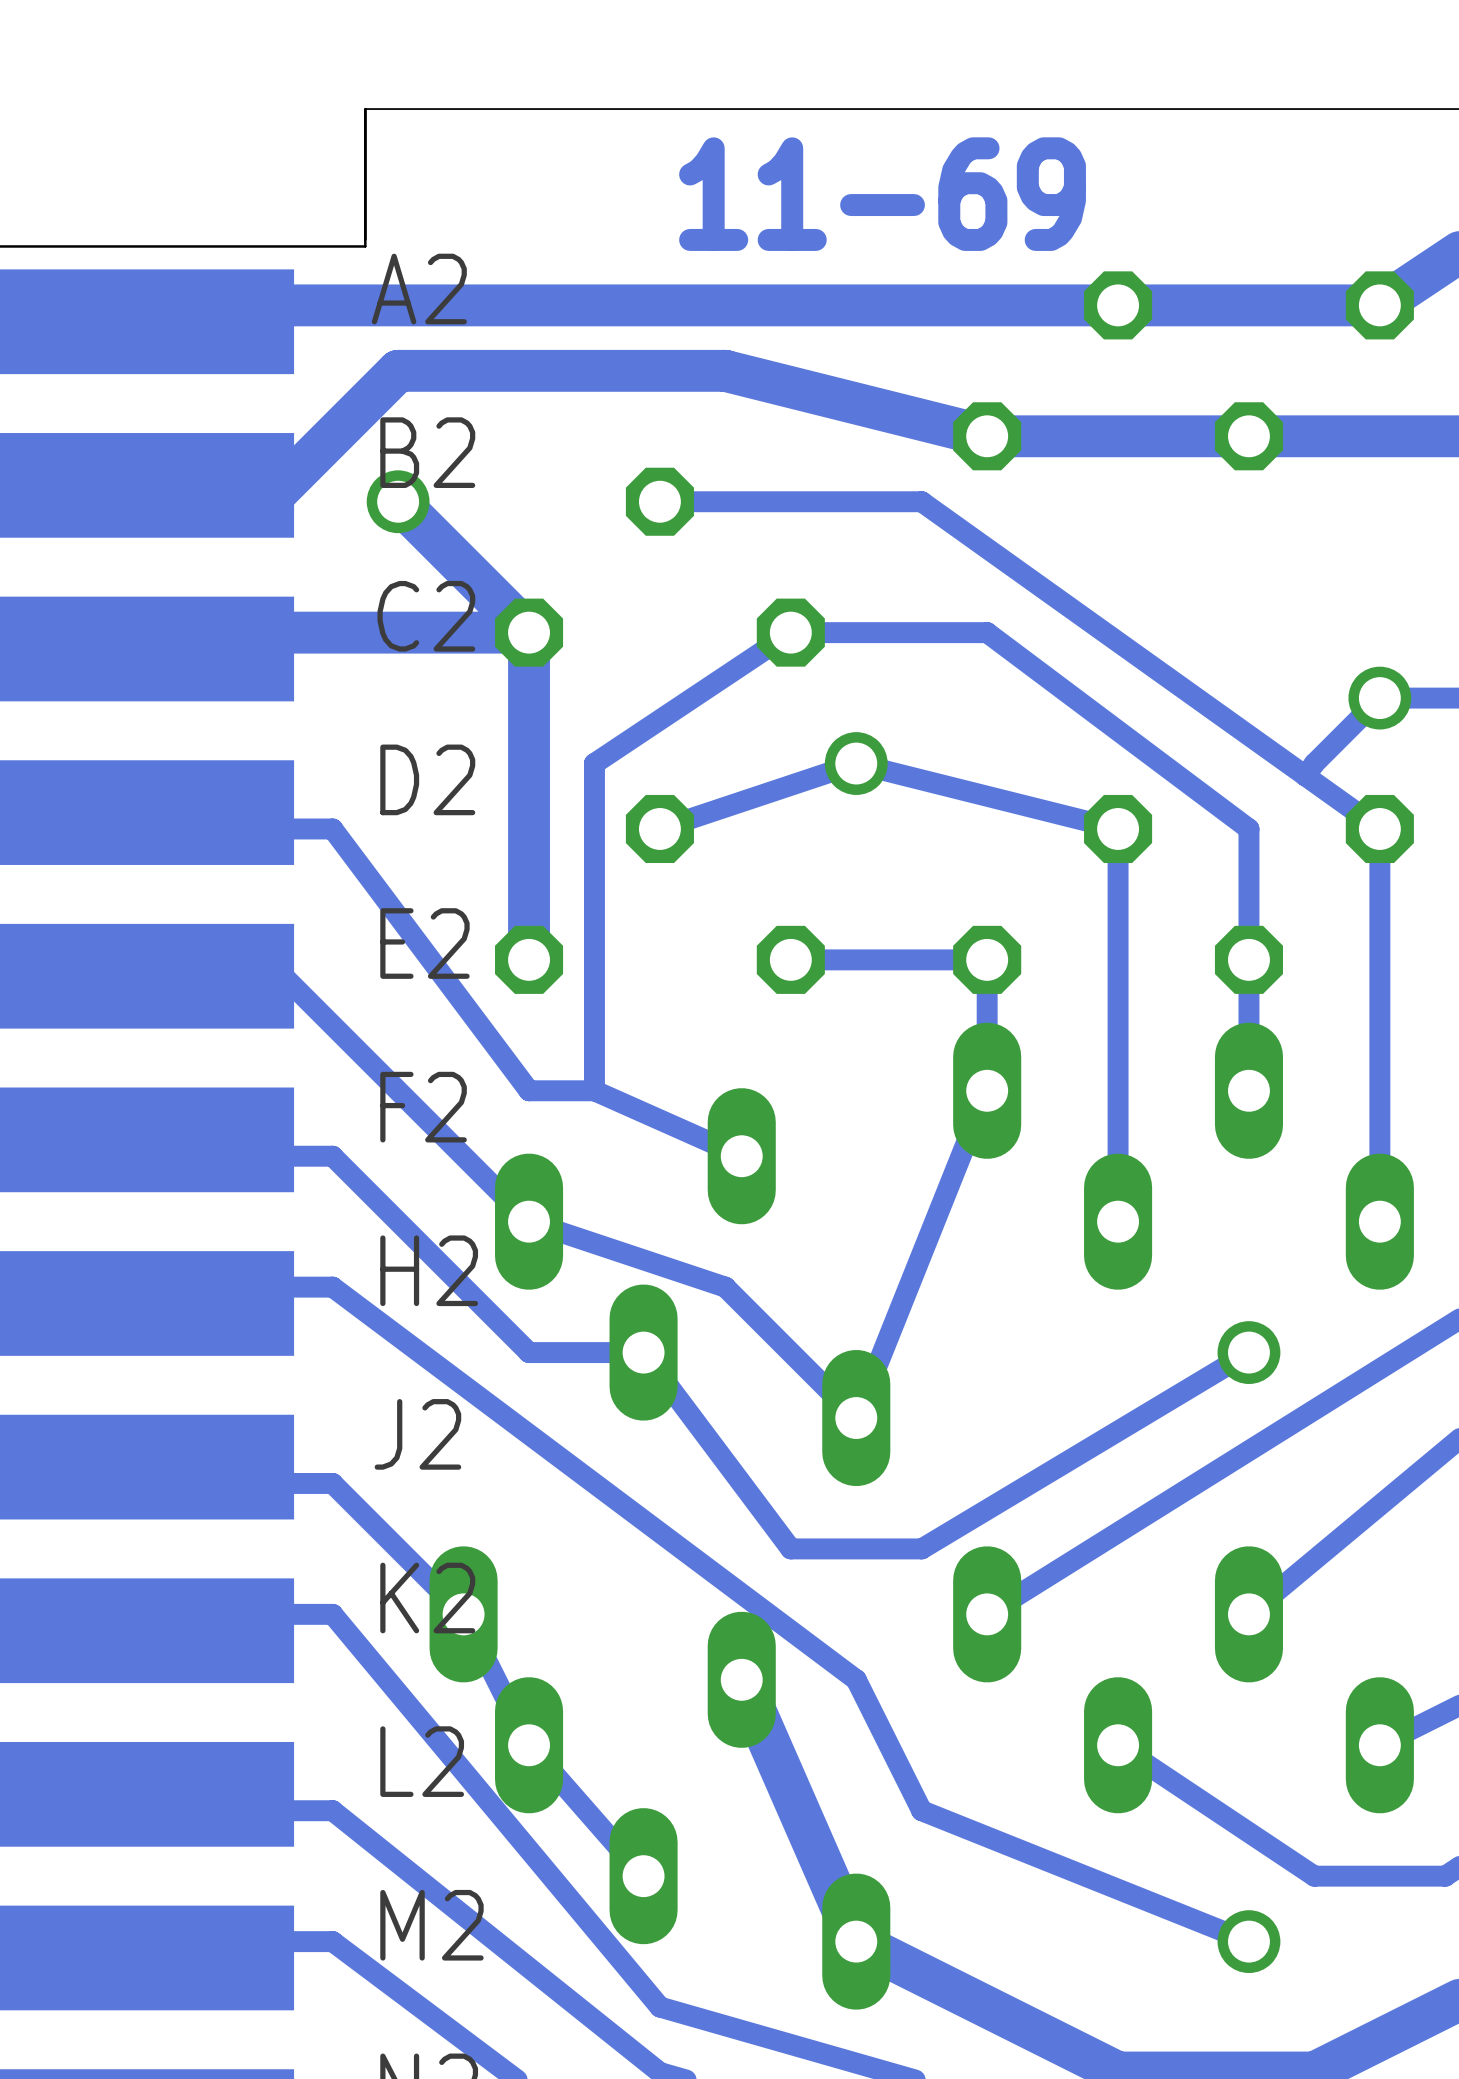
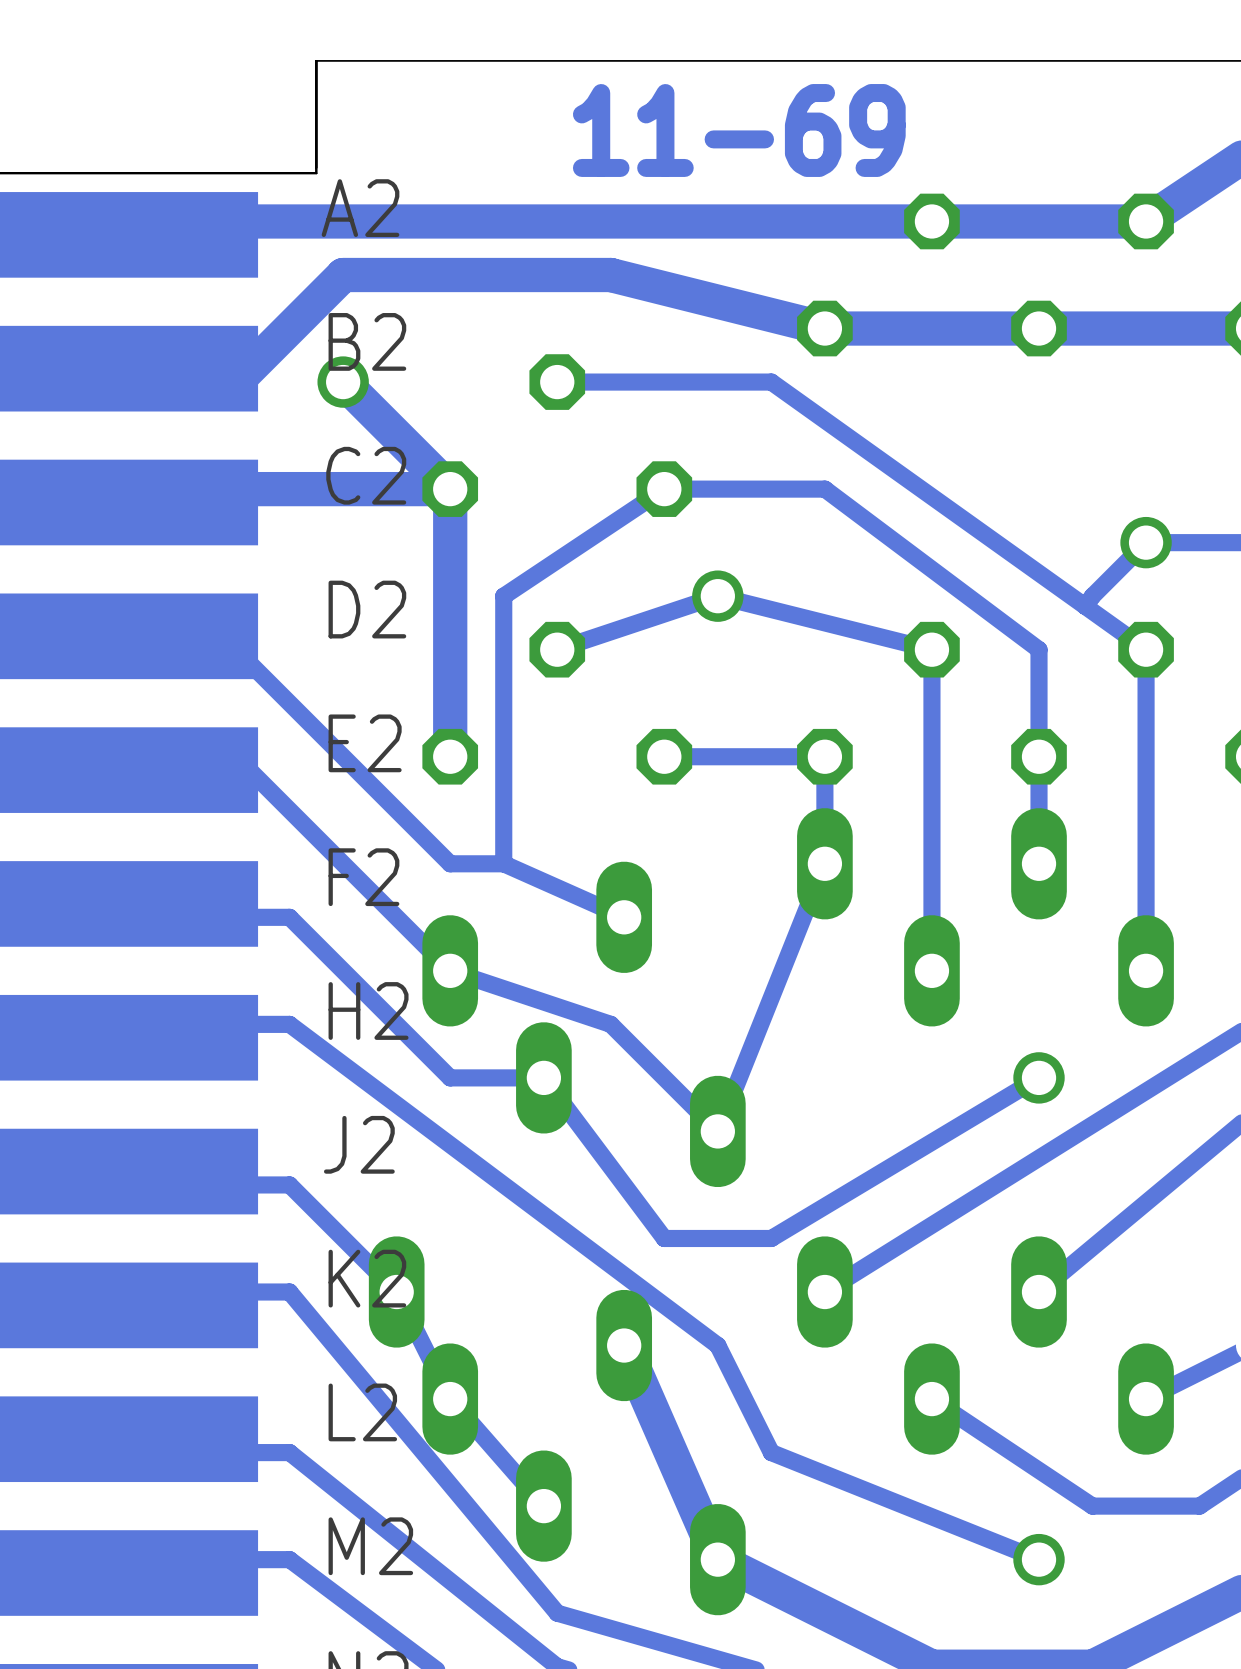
track: (267, 828) (332, 828) (529, 1090) -> (236, 649) (450, 863)

